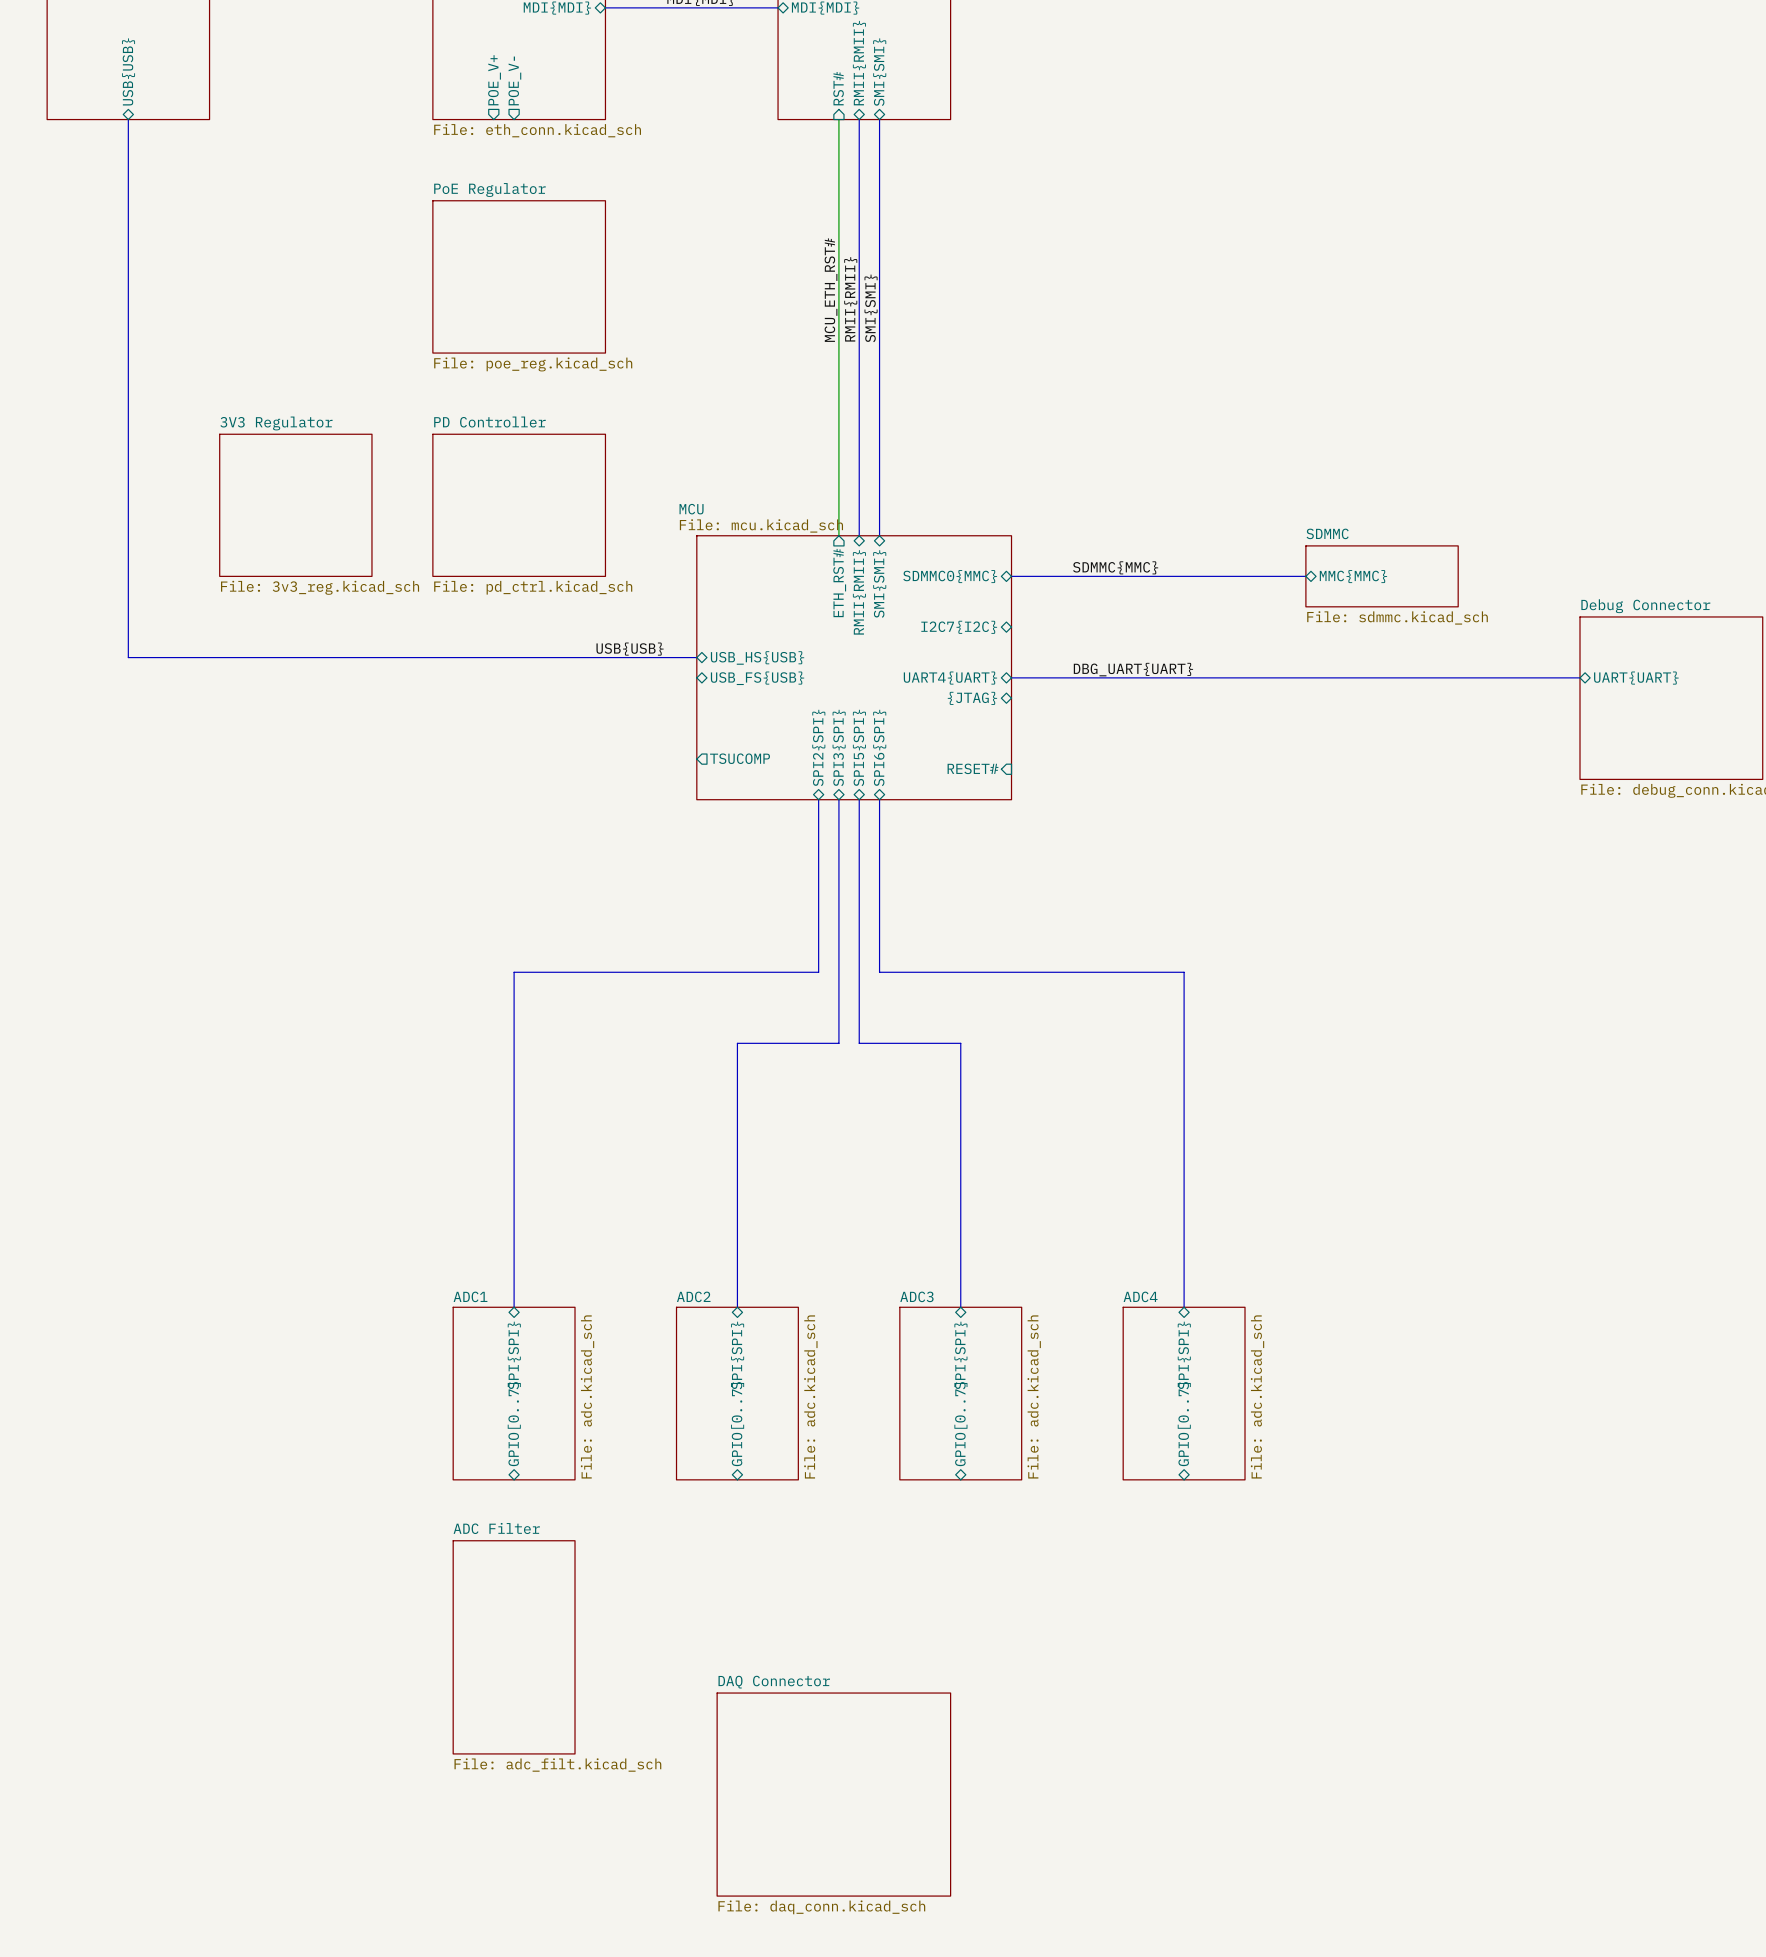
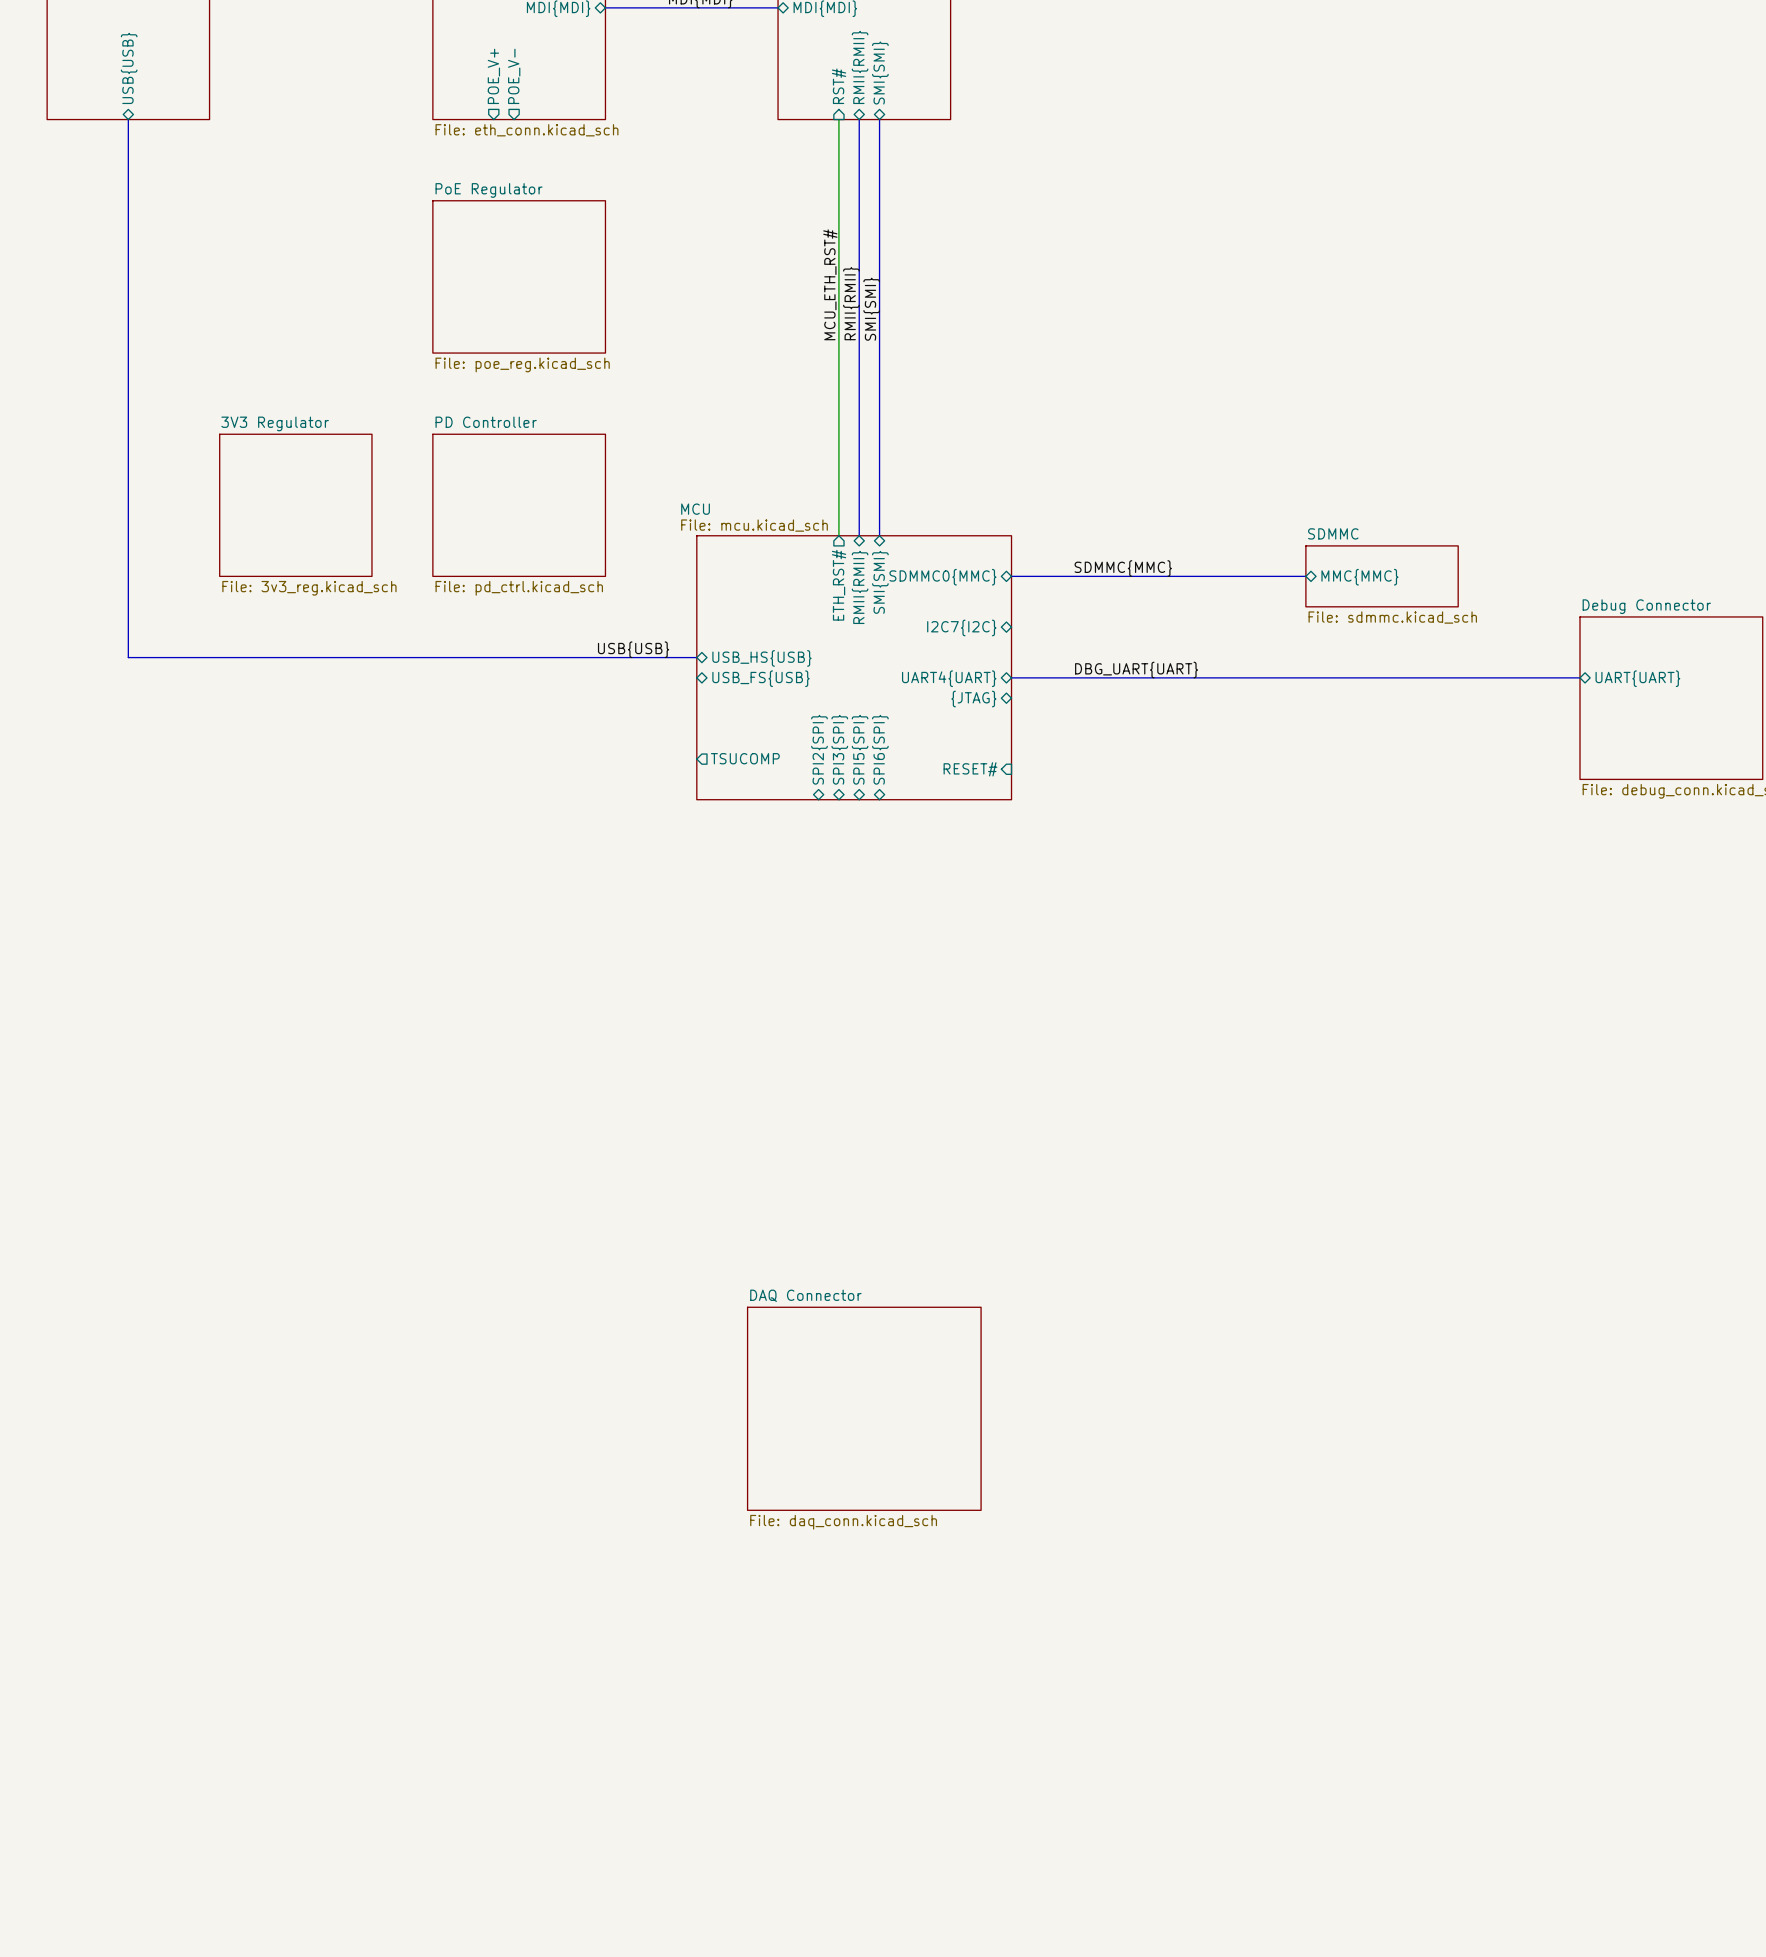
bus: (818, 799) (818, 972) (514, 972) (514, 1307) -> none
bus: (838, 799) (838, 1043) (737, 1043) (737, 1307) -> none
bus: (859, 799) (859, 1043) (960, 1043) (960, 1307) -> none
bus: (879, 799) (879, 972) (1184, 972) (1184, 1307) -> none
sheet pin: SPI{SPI} (514, 1355) -> none
sheet pin: SPI{SPI} (737, 1355) -> none
sheet pin: SPI{SPI} (960, 1355) -> none
sheet pin: SPI{SPI} (1184, 1355) -> none
sheet ADC1: File: adc.kicad_sch (514, 1393) -> none
sheet ADC2: File: adc.kicad_sch (737, 1393) -> none
sheet ADC3: File: adc.kicad_sch (960, 1393) -> none
sheet ADC4: File: adc.kicad_sch (1184, 1393) -> none
sheet DAQ Connector: none -> File: daq_conn.kicad_sch (864, 1408)
sheet pin: GPIO[0..7] (514, 1424) -> none
sheet pin: GPIO[0..7] (737, 1424) -> none
sheet pin: GPIO[0..7] (960, 1424) -> none
sheet pin: GPIO[0..7] (1184, 1424) -> none
sheet ADC Filter: File: adc_filt.kicad_sch (514, 1647) -> none
sheet DAQ Connector: File: daq_conn.kicad_sch (833, 1794) -> none

